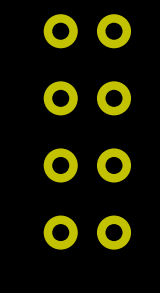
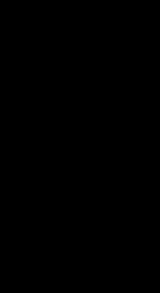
part: (87, 31) -> none
part: (87, 98) -> none
part: (87, 165) -> none
part: (87, 232) -> none

